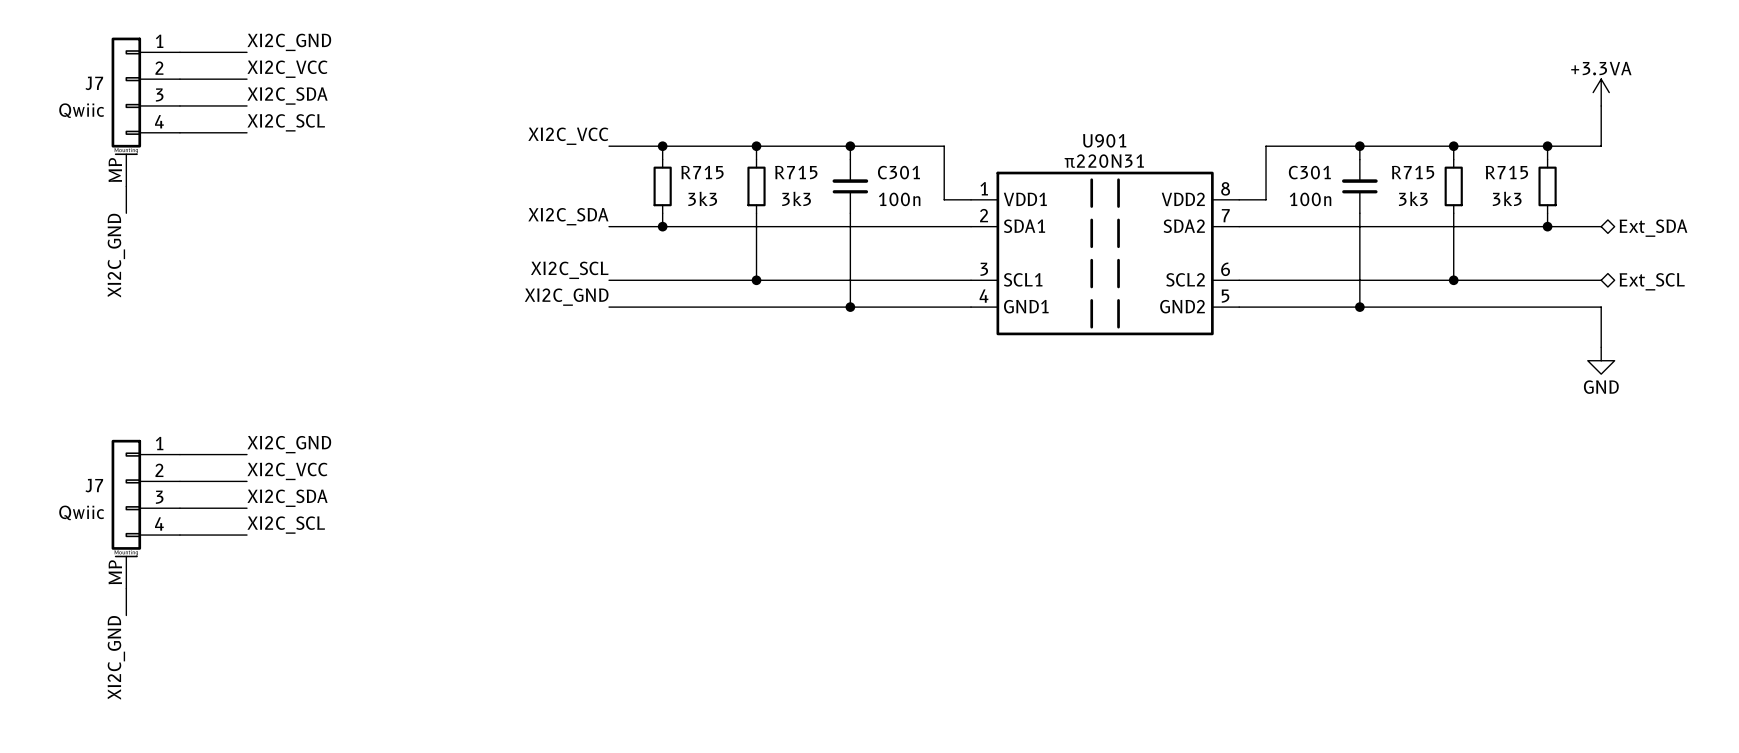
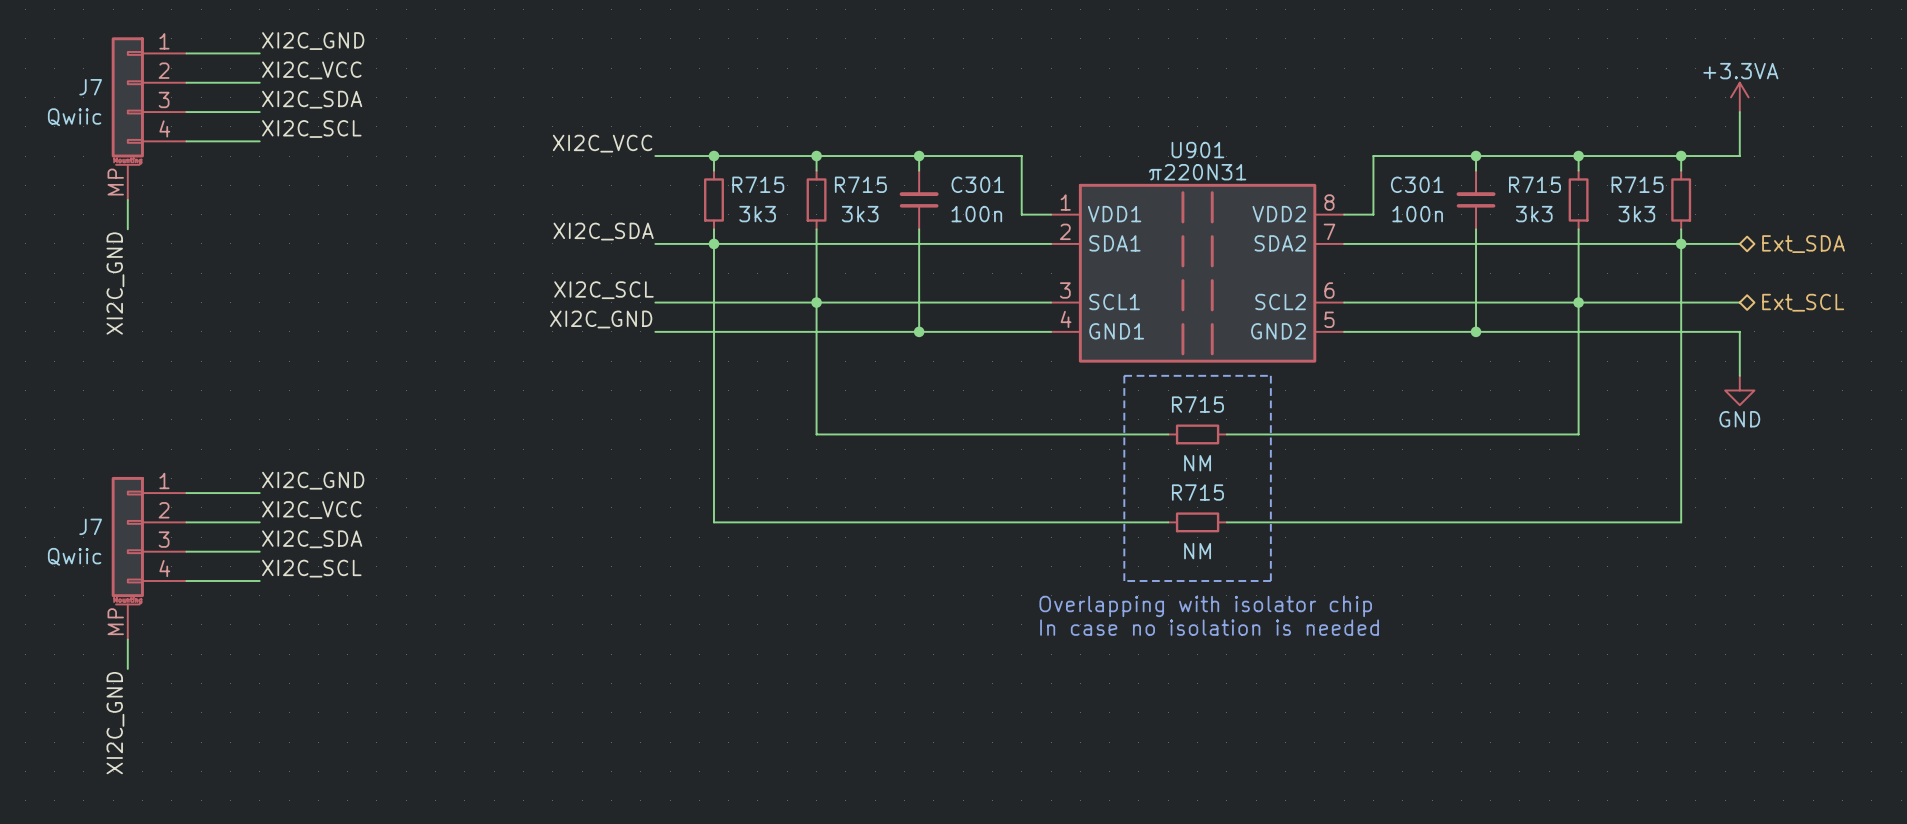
wire: none -> (713, 243) (713, 522) (1168, 522)
wire: none -> (1681, 243) (1681, 522) (1226, 522)
wire: none -> (816, 302) (816, 434) (1168, 434)
wire: none -> (1578, 302) (1578, 434) (1226, 434)
line: none -> (1124, 375) (1270, 375) (1270, 580) (1124, 580) (1124, 375)
R715: none -> NM (1197, 434)
R715: none -> NM (1197, 522)
text: none -> Overlapping with isolator chip (1205, 606)
text: none -> In case no isolation is needed (1209, 627)

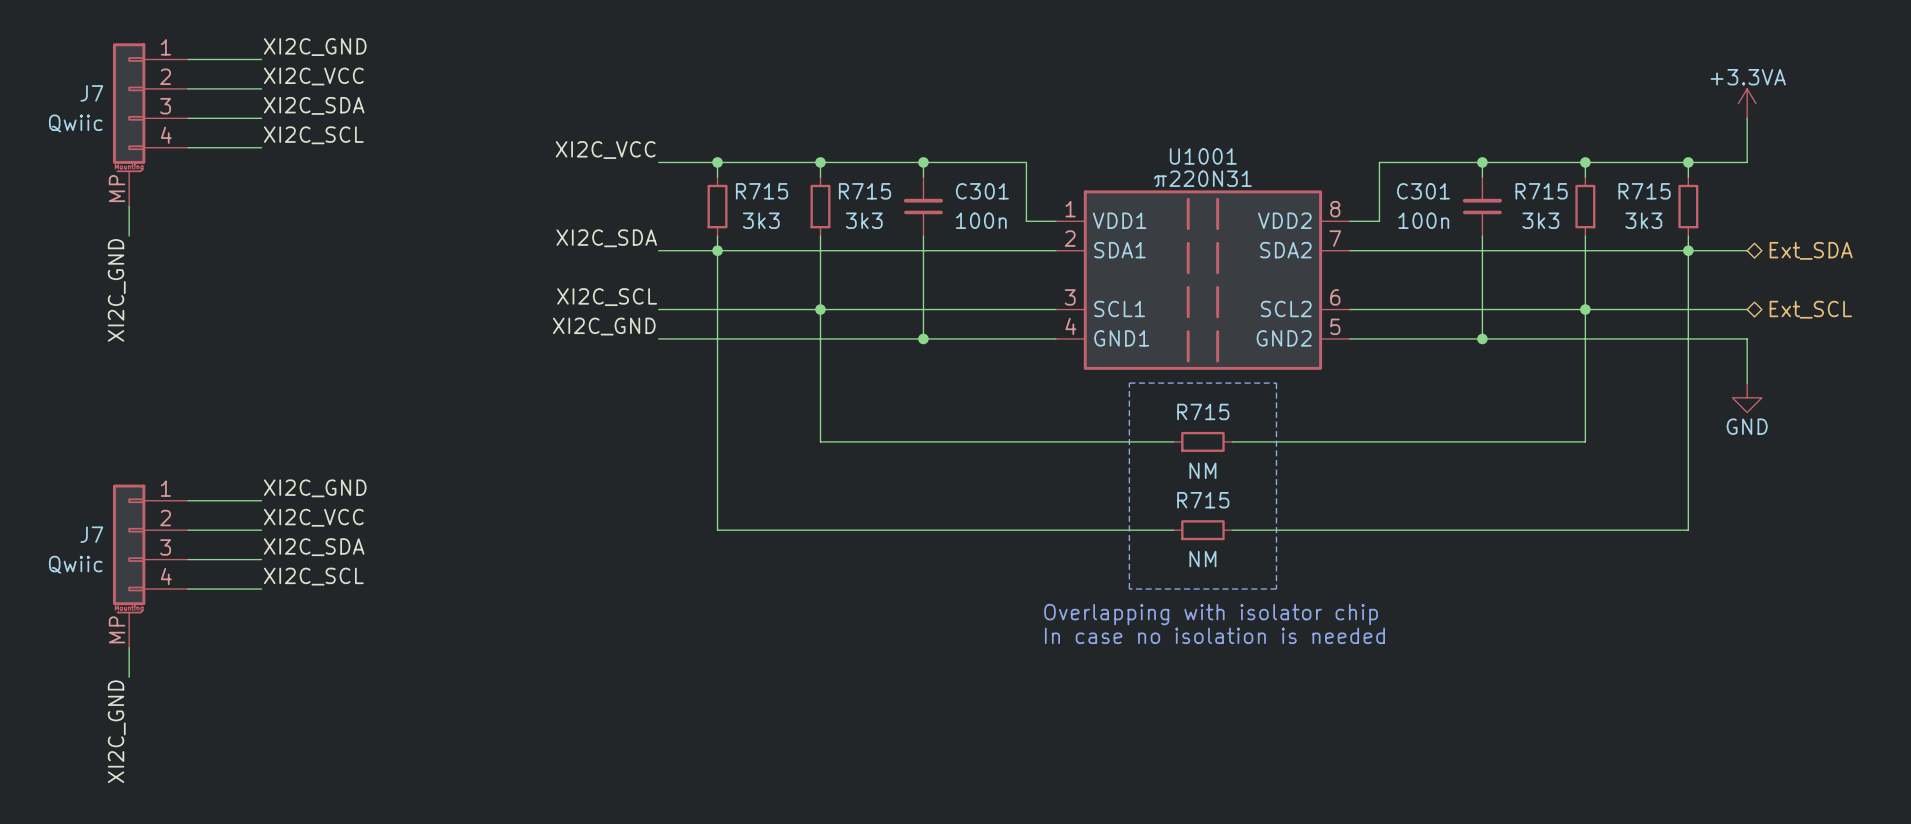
U901 name: U901 (1197, 150) -> U1001 (1203, 156)

